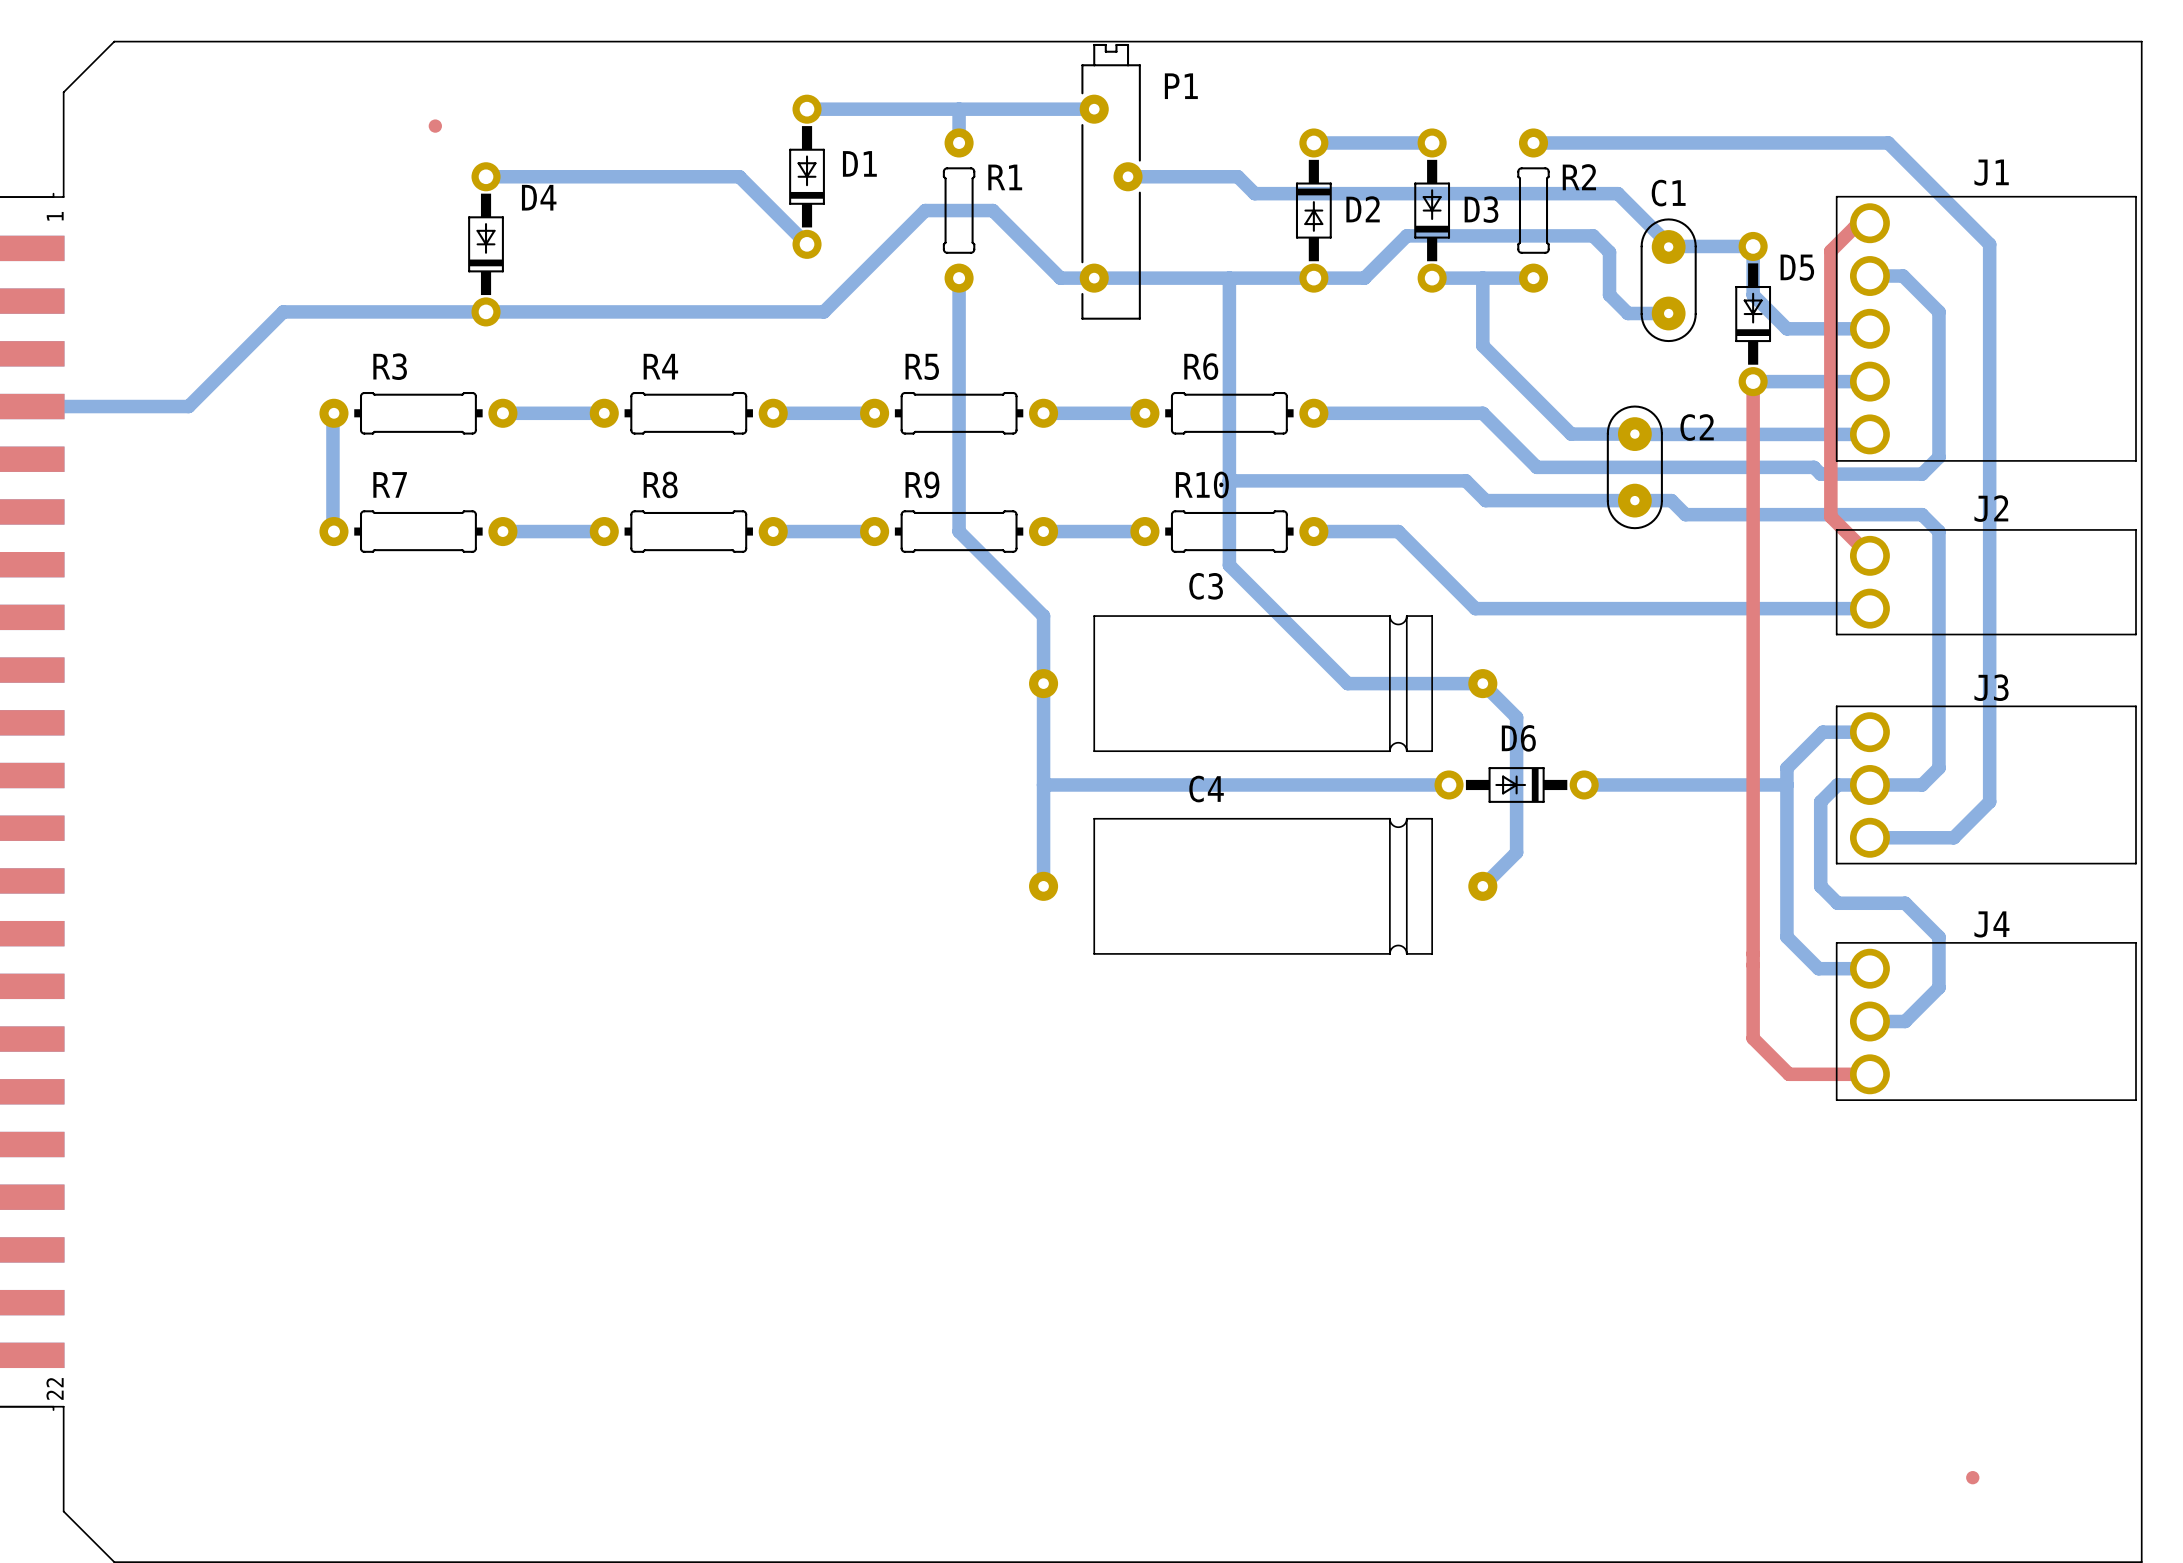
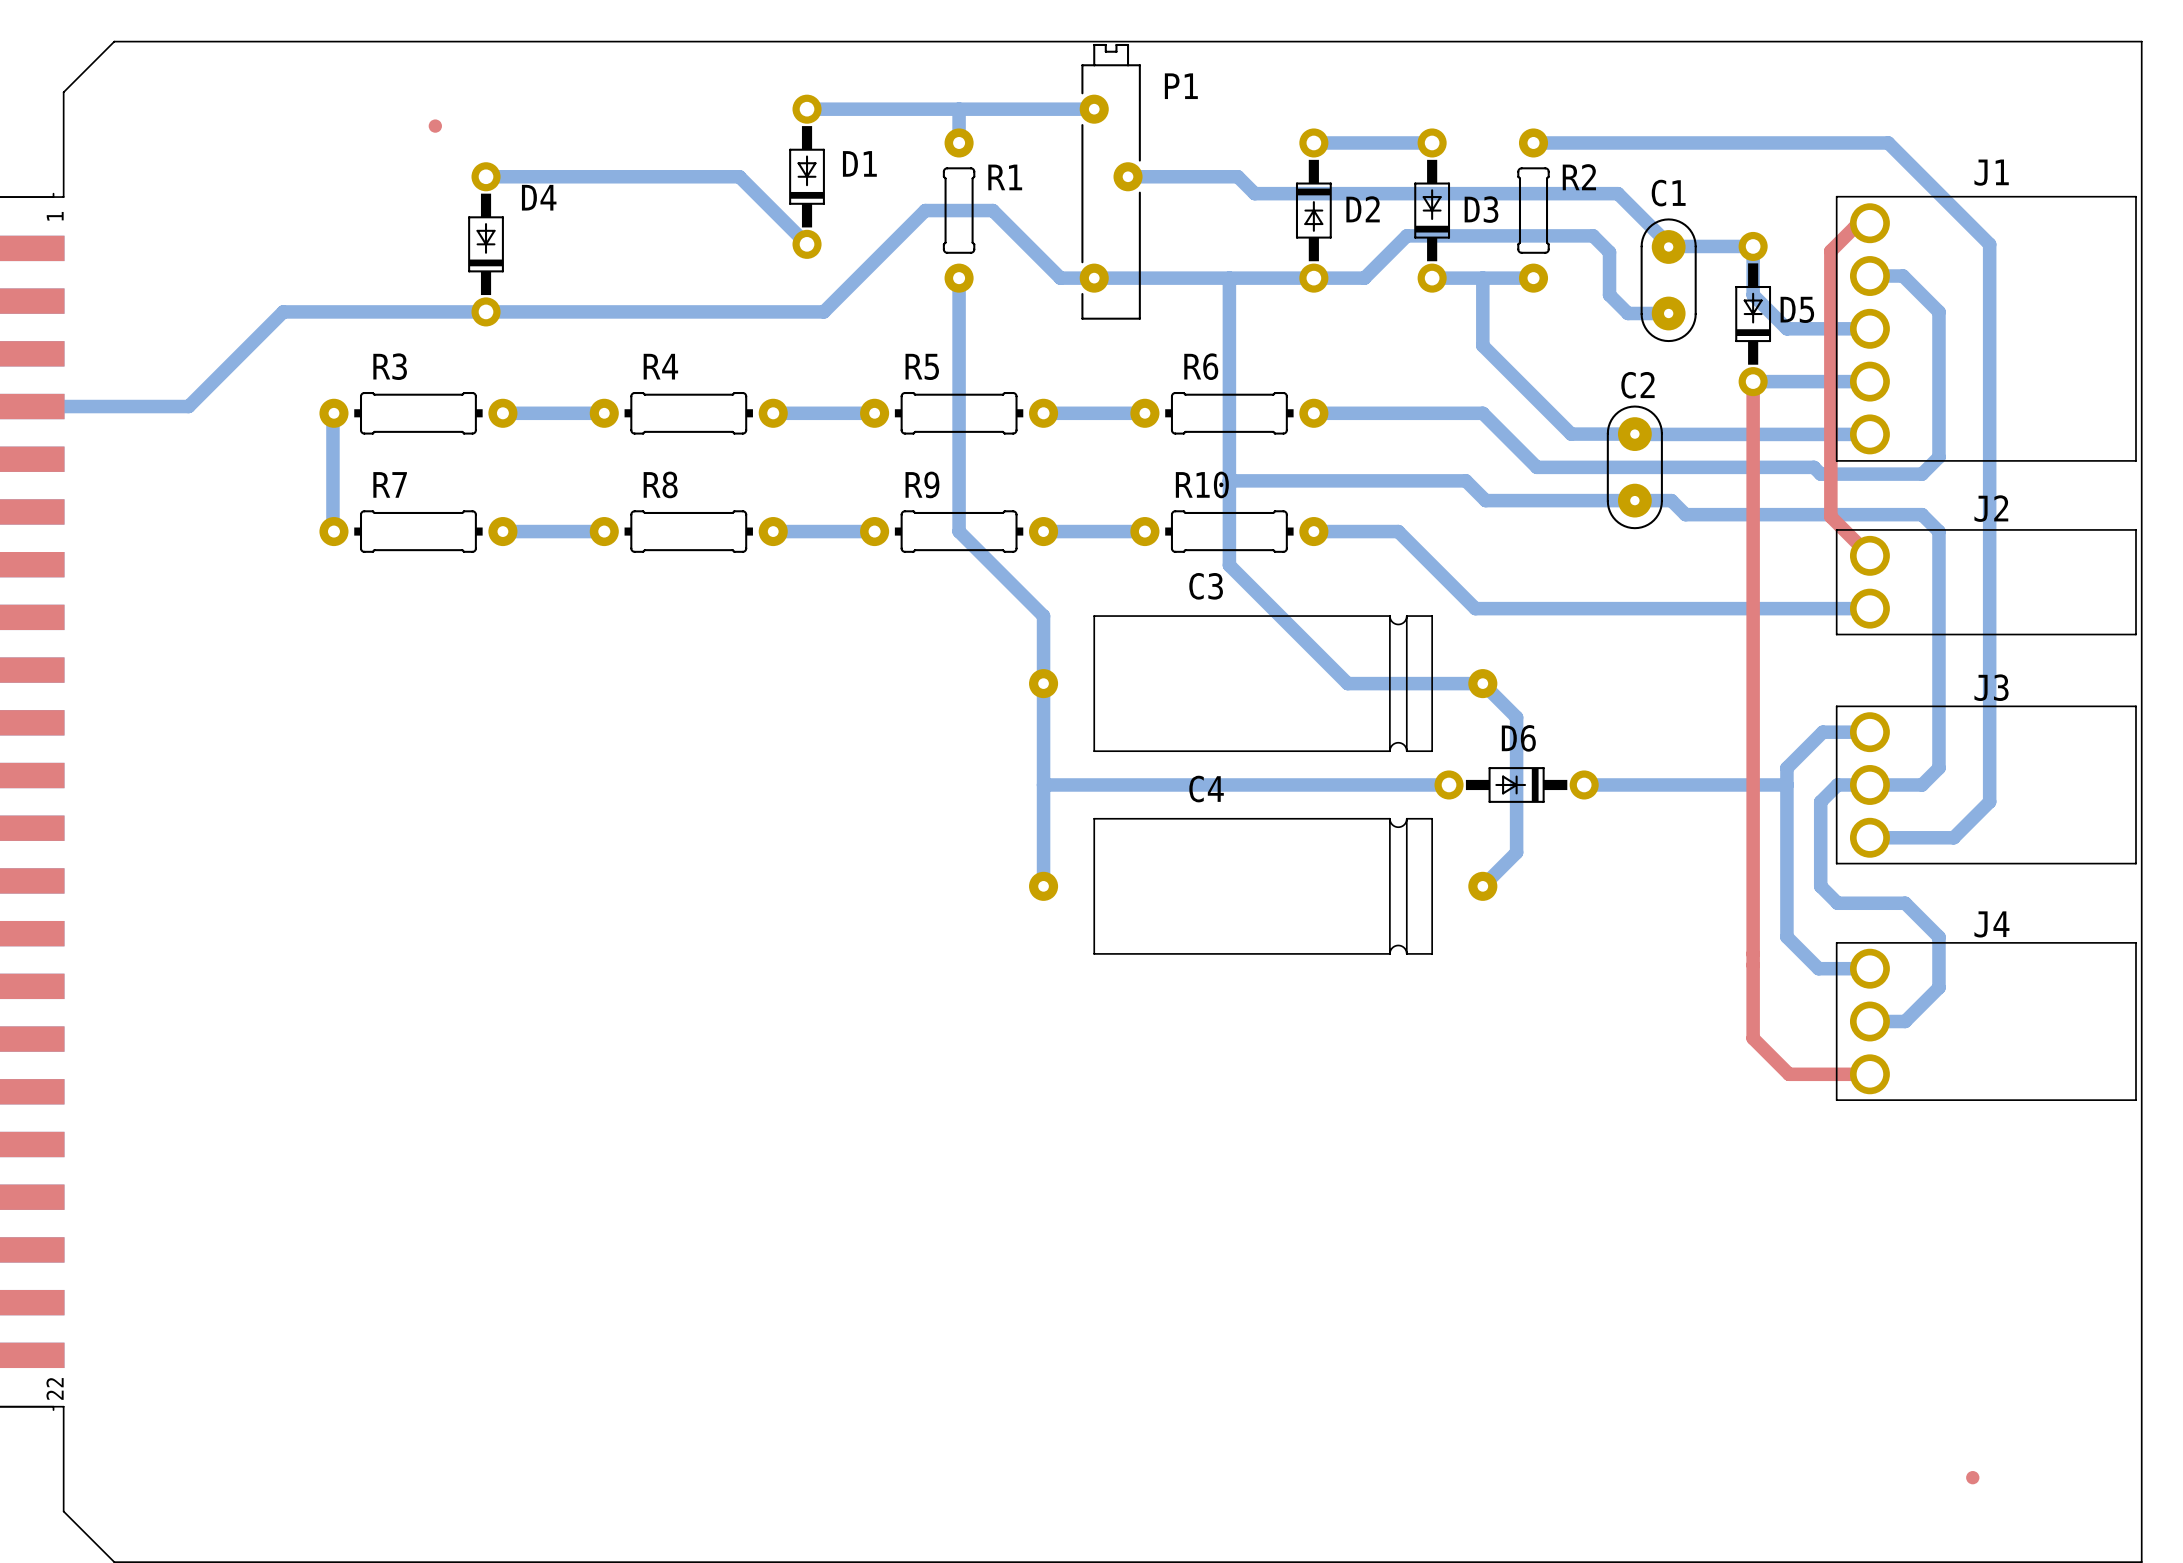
D5 name position: D5 (1797, 267) -> D5 (1797, 309)
C2 name position: C2 (1697, 427) -> C2 (1637, 385)

